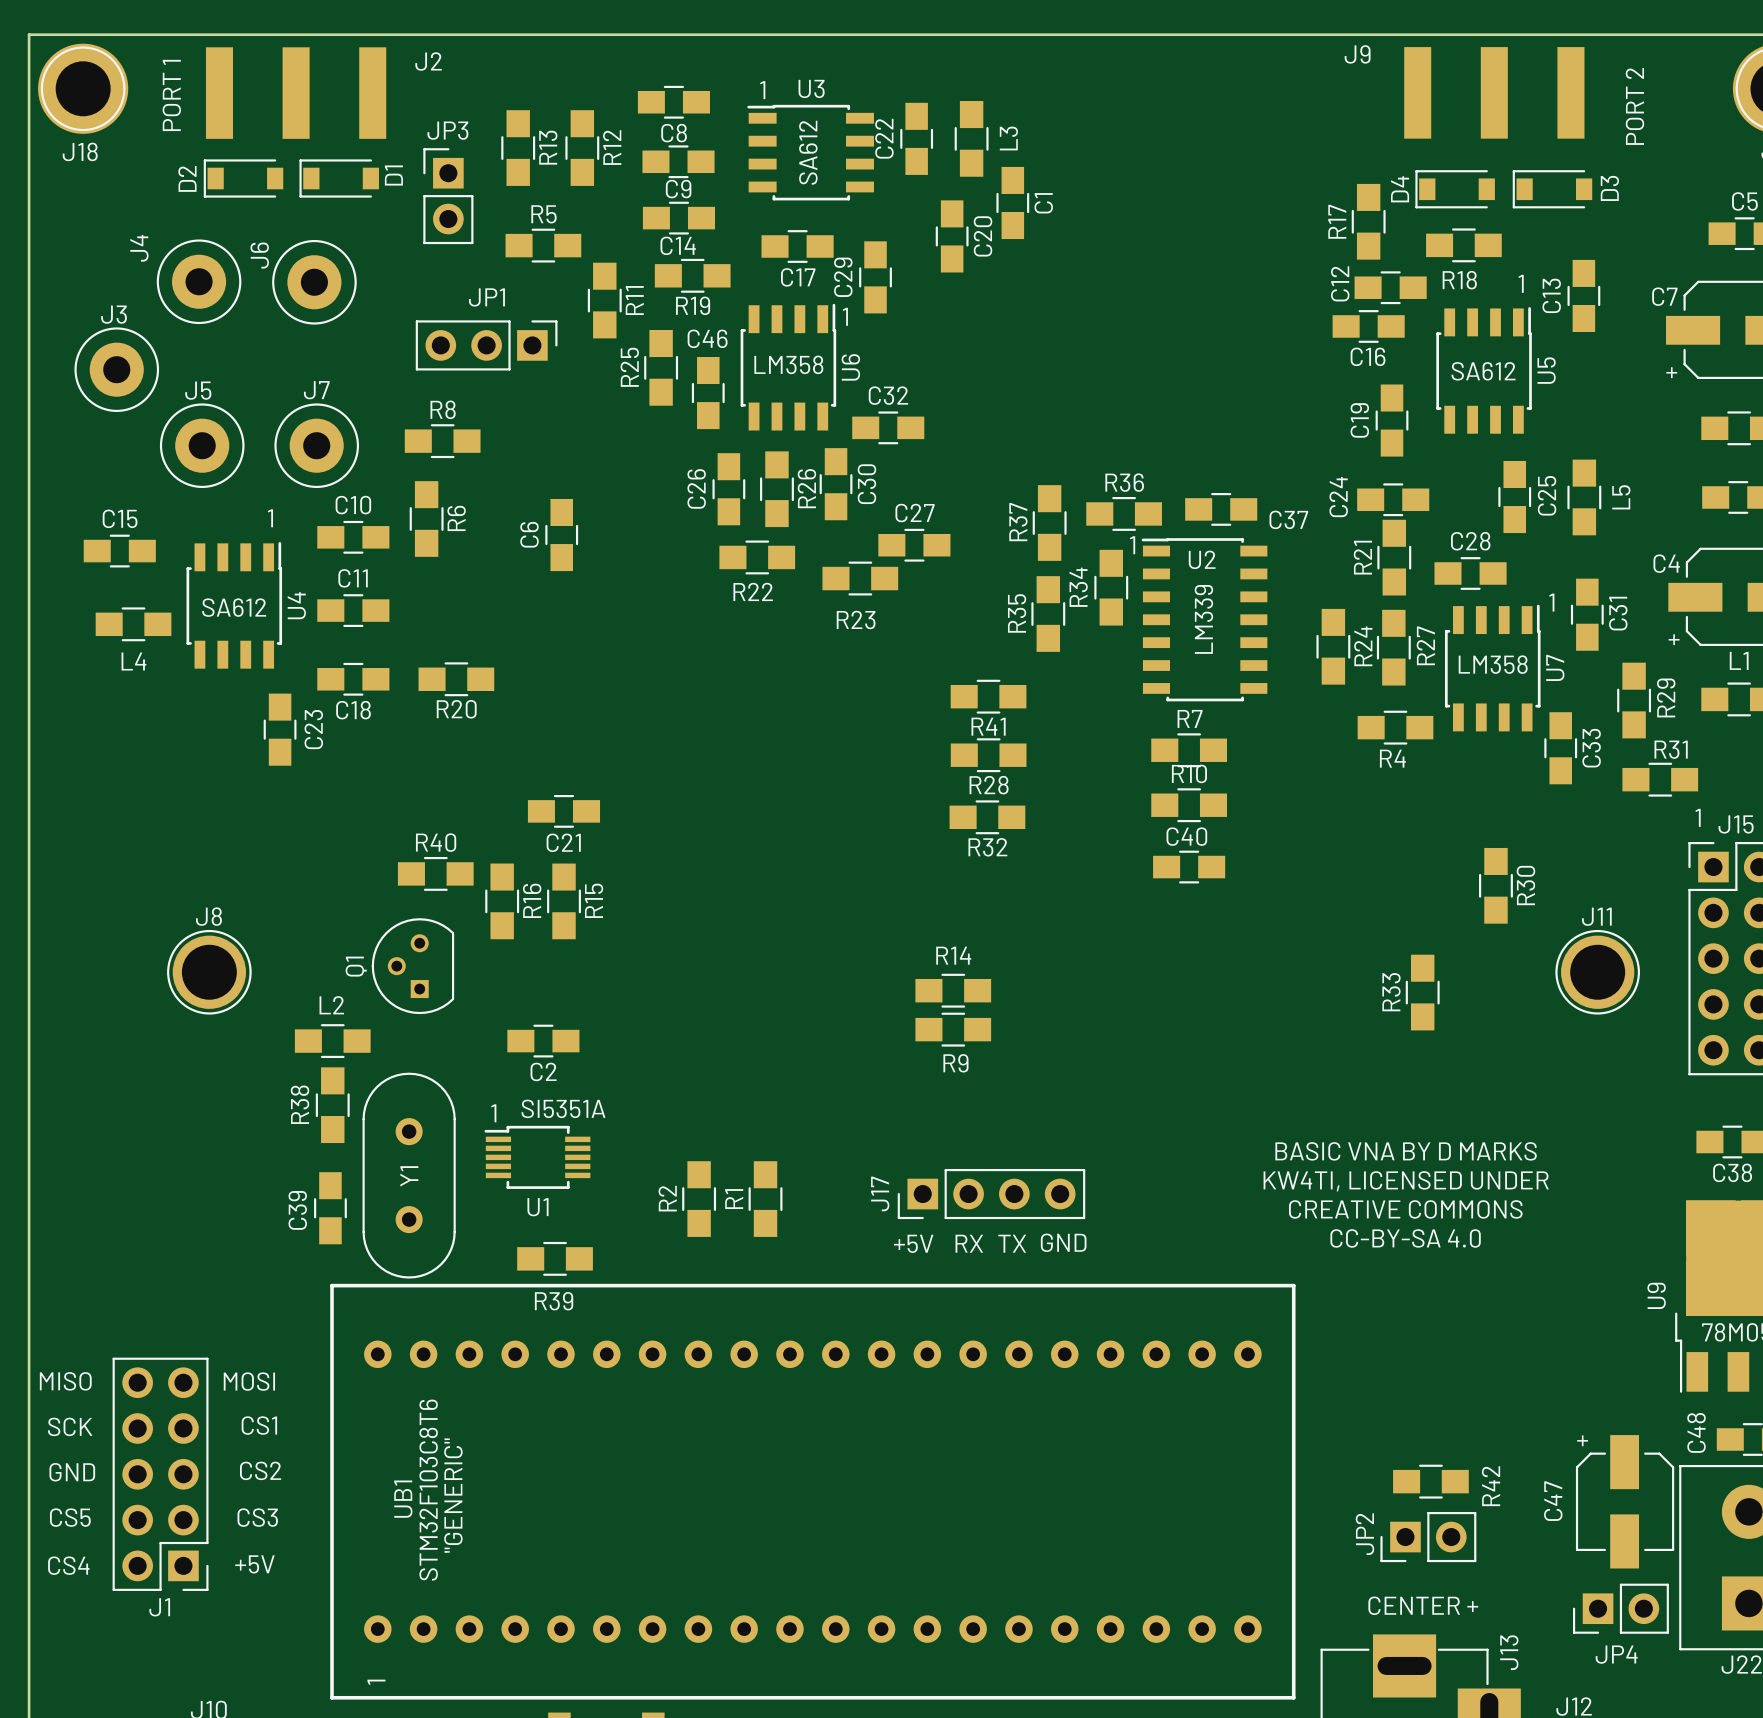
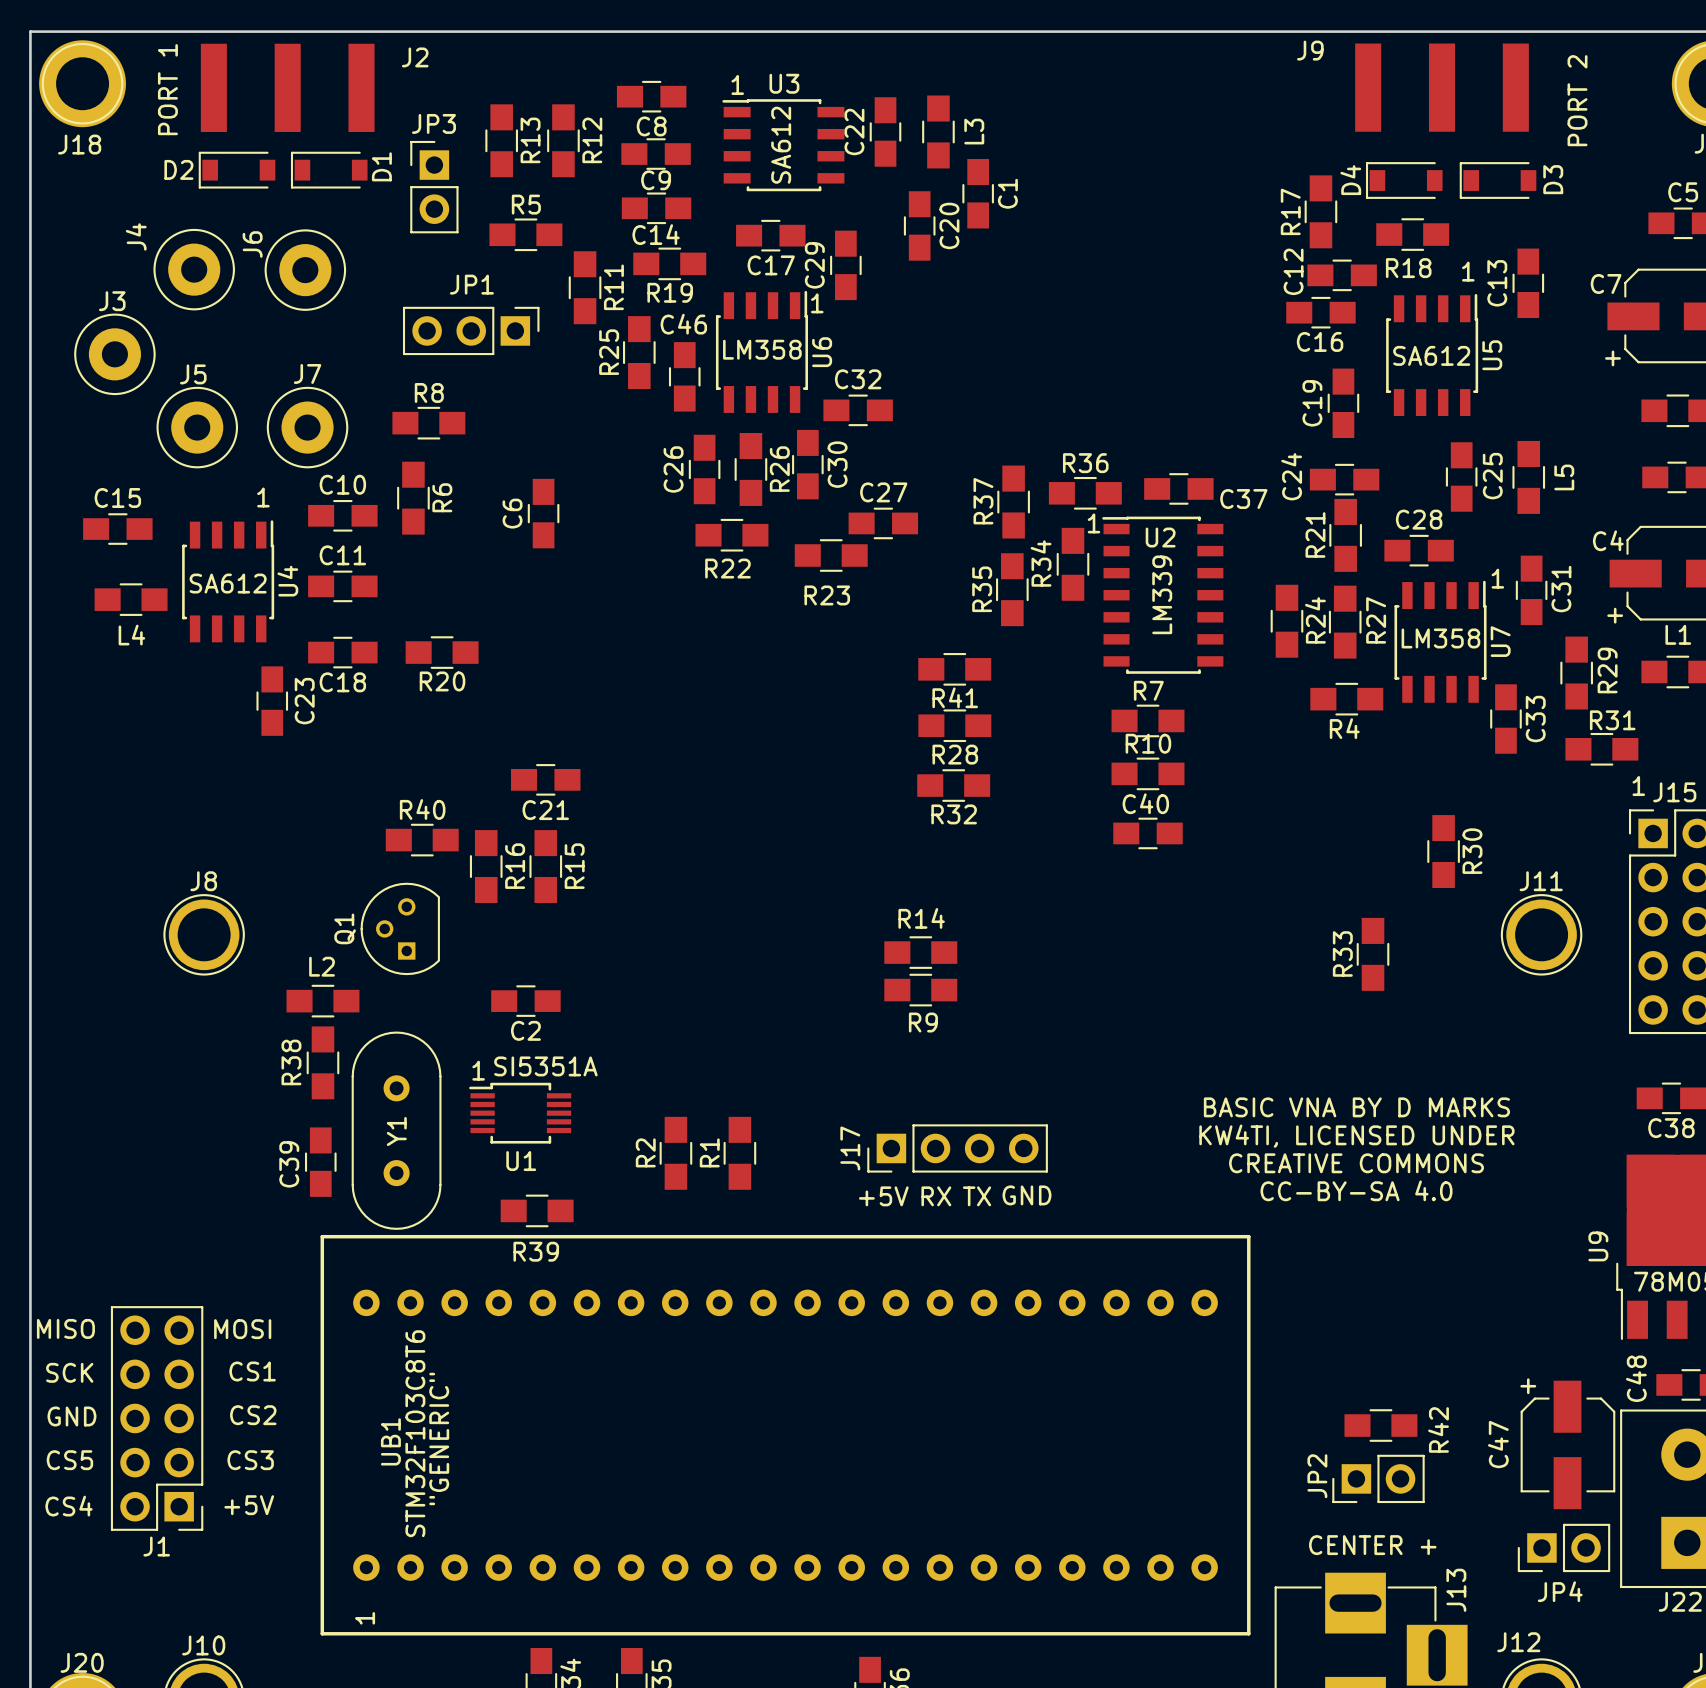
D2 name rotation: 0° (187, 178) -> 90° clockwise (178, 169)

